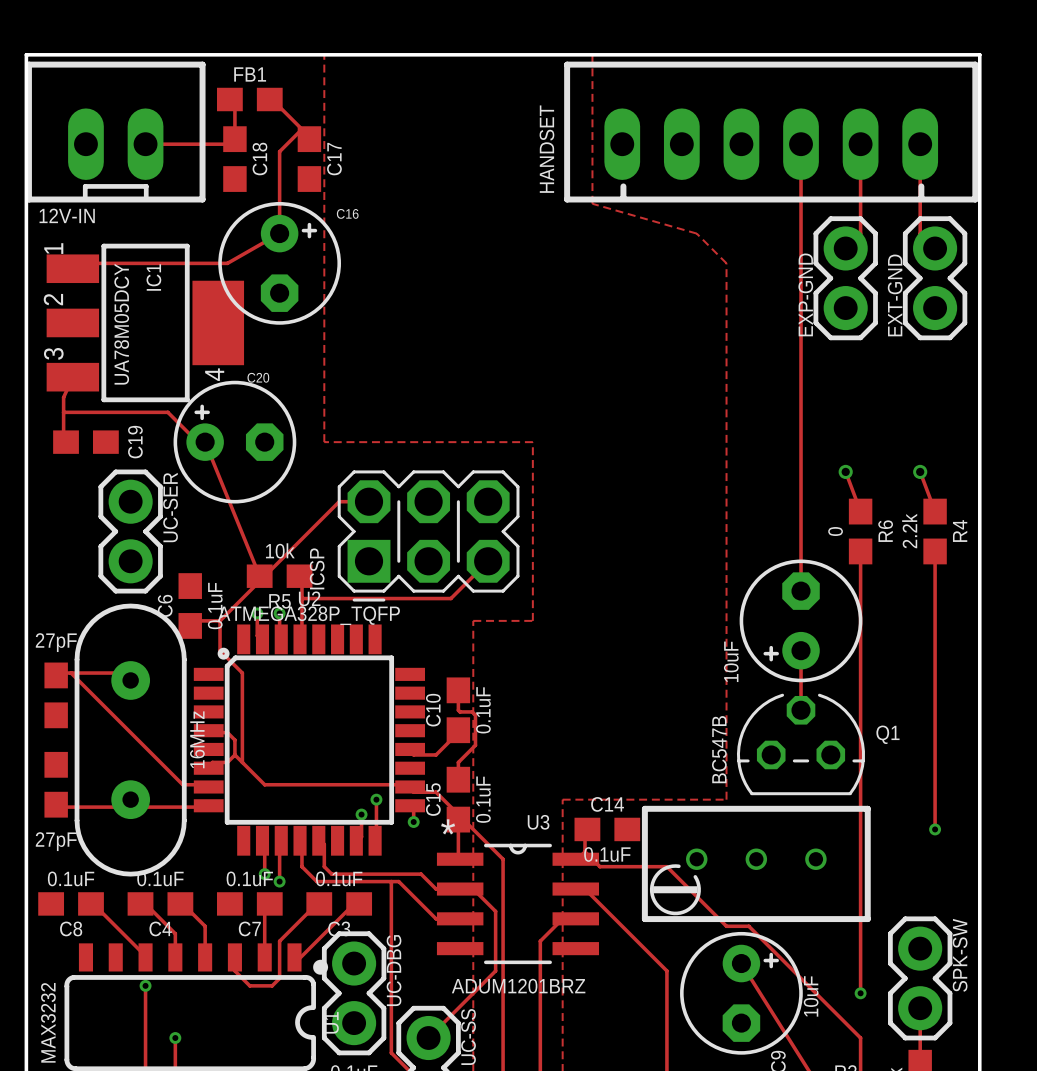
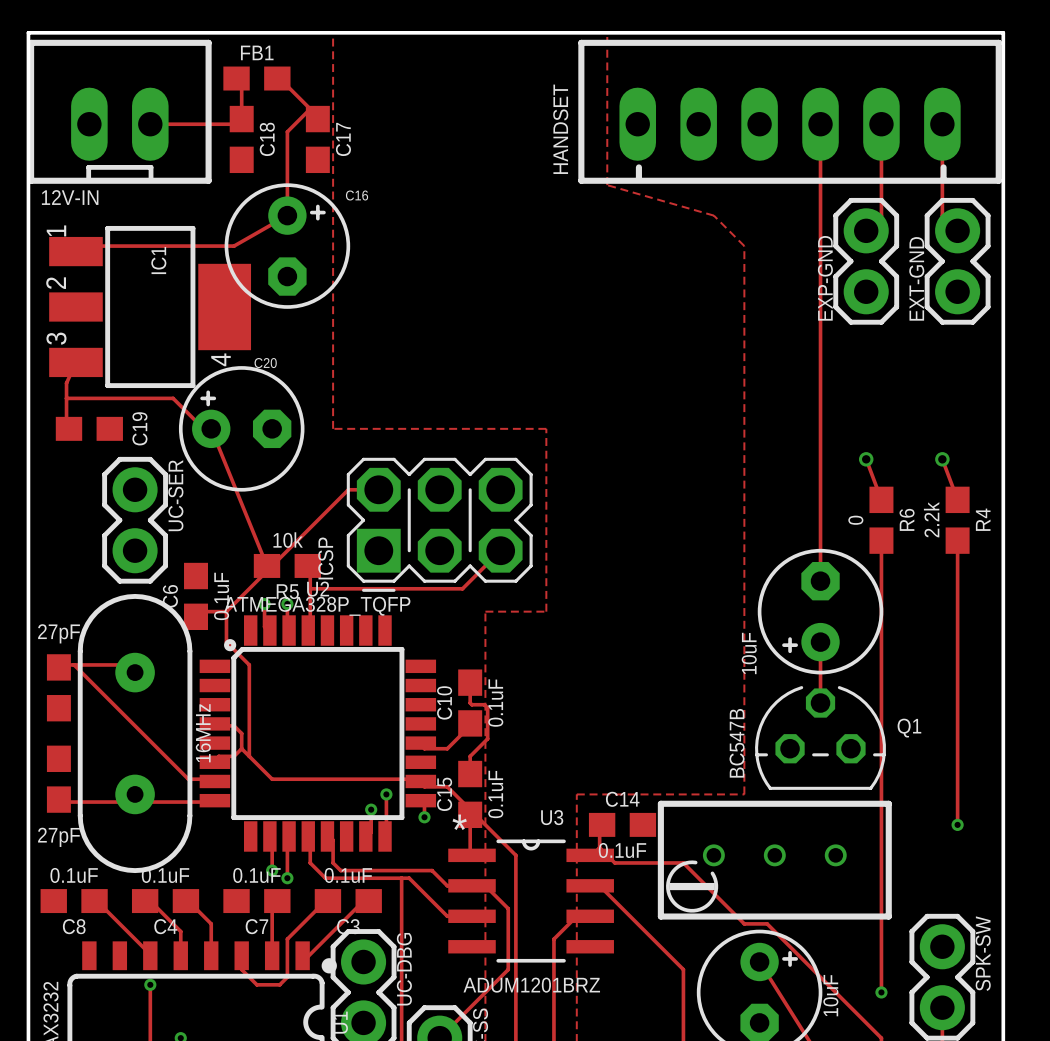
IC1 value: UA78M05DCY (121, 324) -> none

